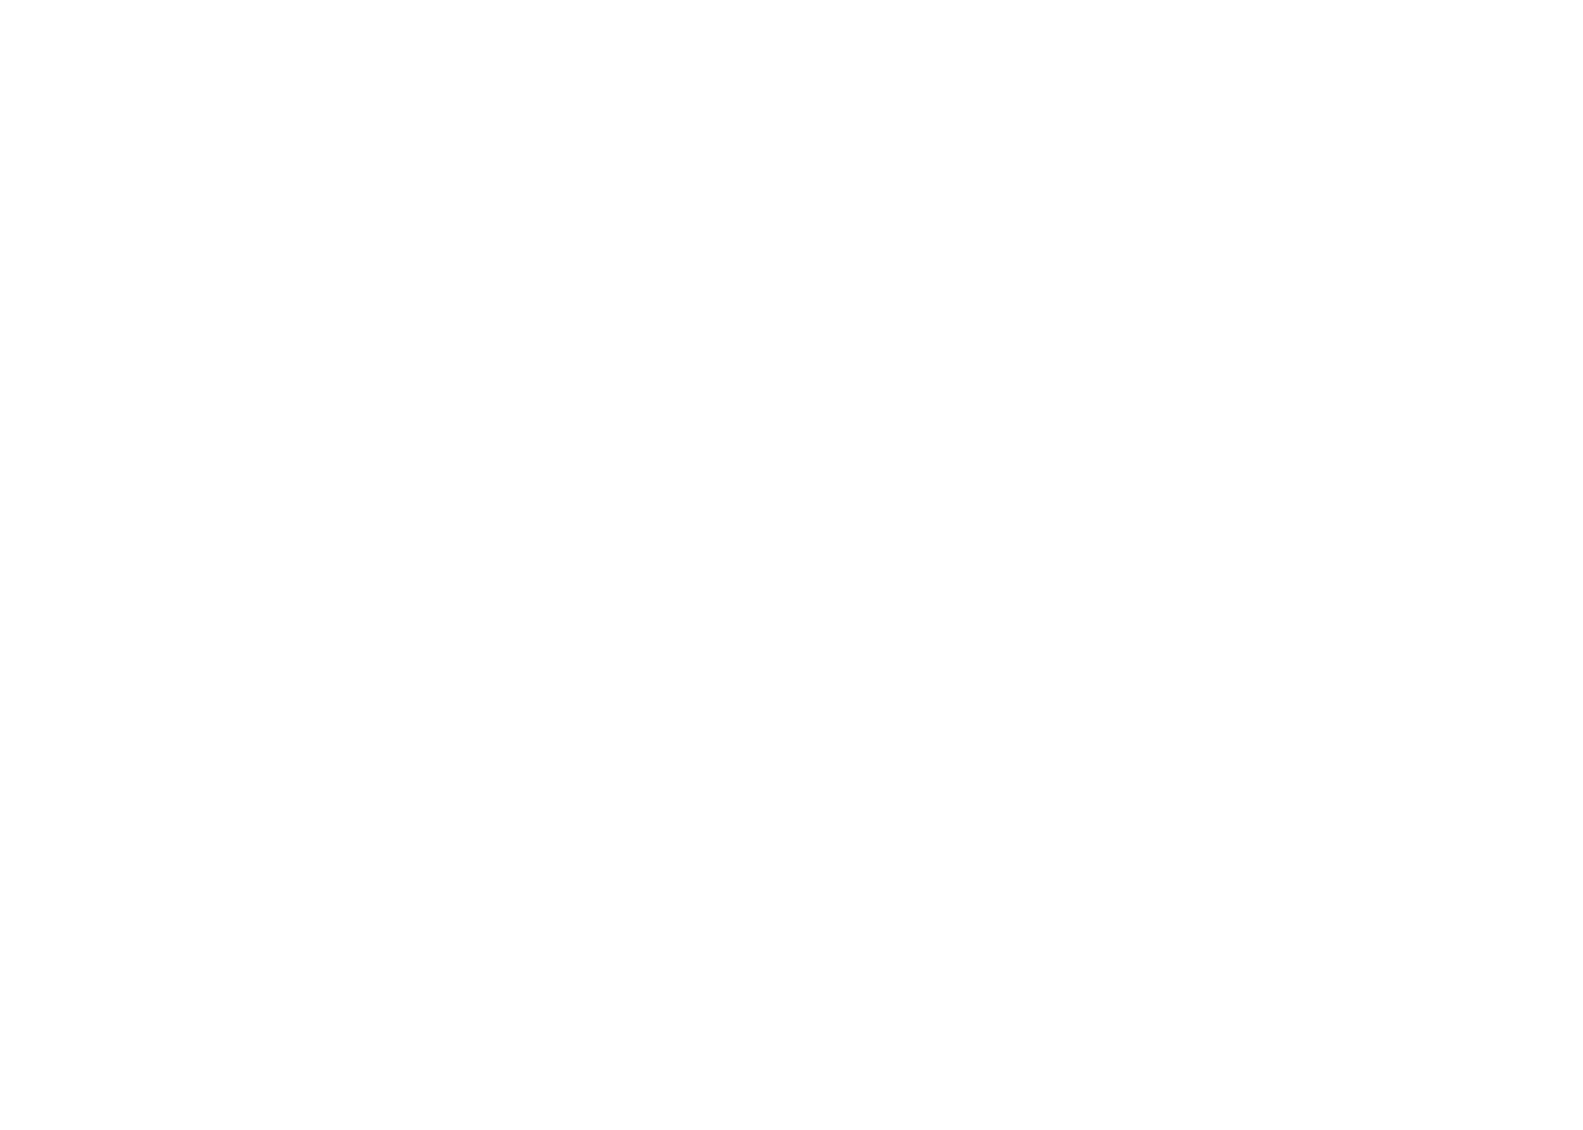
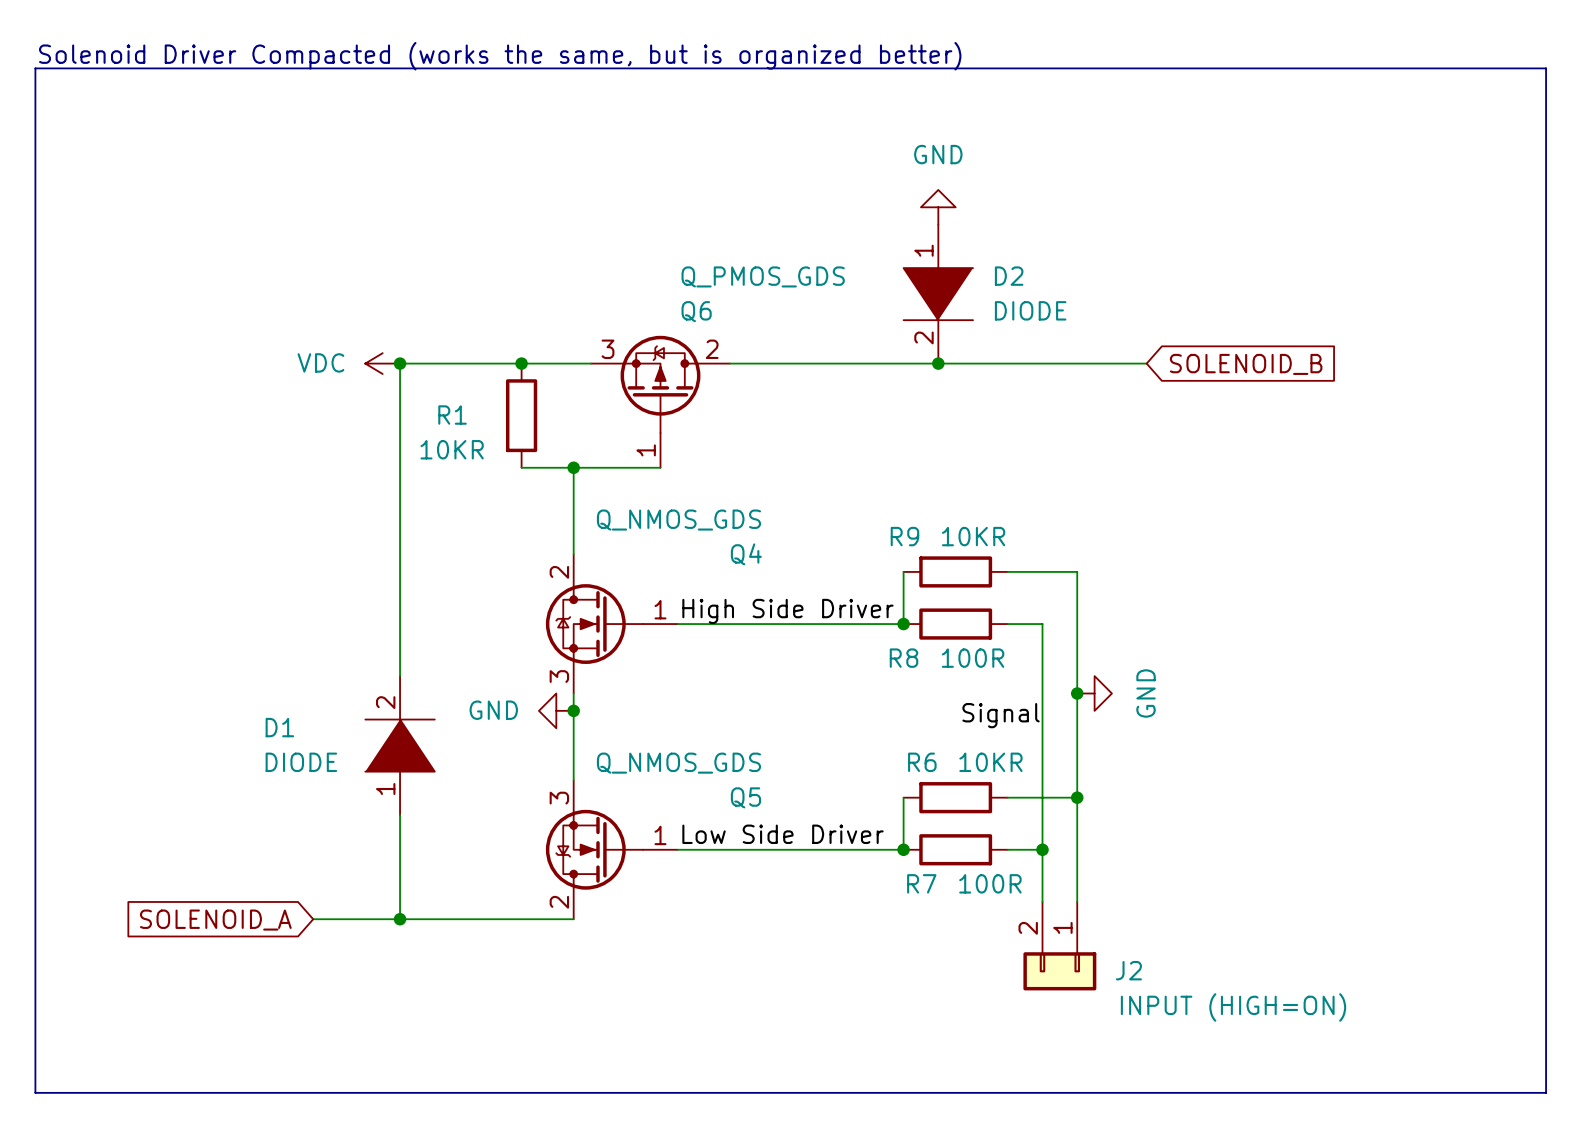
text: none -> Solenoid Driver Compacted (works the same, but is organized better) (500, 56)
line: none -> (35, 68) (1546, 68) (1546, 1092) (35, 1092) (35, 68)
power symbol: none -> GND (938, 207)
D2: none -> DIODE (938, 294)
power symbol: none -> VDC (382, 363)
junction: none -> (400, 363)
junction: none -> (521, 363)
wire: none -> (591, 363) (400, 363) (400, 676)
wire: none -> (729, 363) (1146, 363)
junction: none -> (938, 363)
global label: none -> SOLENOID_B (1246, 364)
Q6: none -> Q_PMOS_GDS (660, 401)
R1: none -> 10KR (521, 415)
wire: none -> (521, 467) (660, 467)
wire: none -> (573, 467) (573, 554)
junction: none -> (573, 467)
wire: none -> (903, 571) (903, 624) (677, 624)
R9: none -> 10KR (955, 571)
wire: none -> (1007, 571) (1077, 571) (1077, 901)
label: none -> High Side Driver (787, 611)
Q4: none -> Q_NMOS_GDS (611, 624)
junction: none -> (903, 624)
R8: none -> 100R (955, 624)
wire: none -> (1007, 624) (1042, 624) (1042, 901)
wire: none -> (573, 693) (573, 780)
junction: none -> (1077, 693)
power symbol: none -> GND (1094, 693)
power symbol: none -> GND (556, 710)
junction: none -> (573, 710)
label: none -> Signal (1001, 715)
D1: none -> DIODE (400, 745)
wire: none -> (903, 797) (903, 849) (677, 849)
R6: none -> 10KR (955, 797)
wire: none -> (1007, 797) (1077, 797)
junction: none -> (1077, 797)
wire: none -> (400, 815) (400, 919)
label: none -> Low Side Driver (783, 834)
Q5: none -> Q_NMOS_GDS (611, 849)
junction: none -> (903, 849)
R7: none -> 100R (955, 849)
wire: none -> (1007, 849) (1042, 849)
junction: none -> (1042, 849)
wire: none -> (313, 919) (573, 919)
junction: none -> (400, 919)
global label: none -> SOLENOID_A (215, 920)
J2: none -> INPUT (HIGH=ON) (1059, 946)

